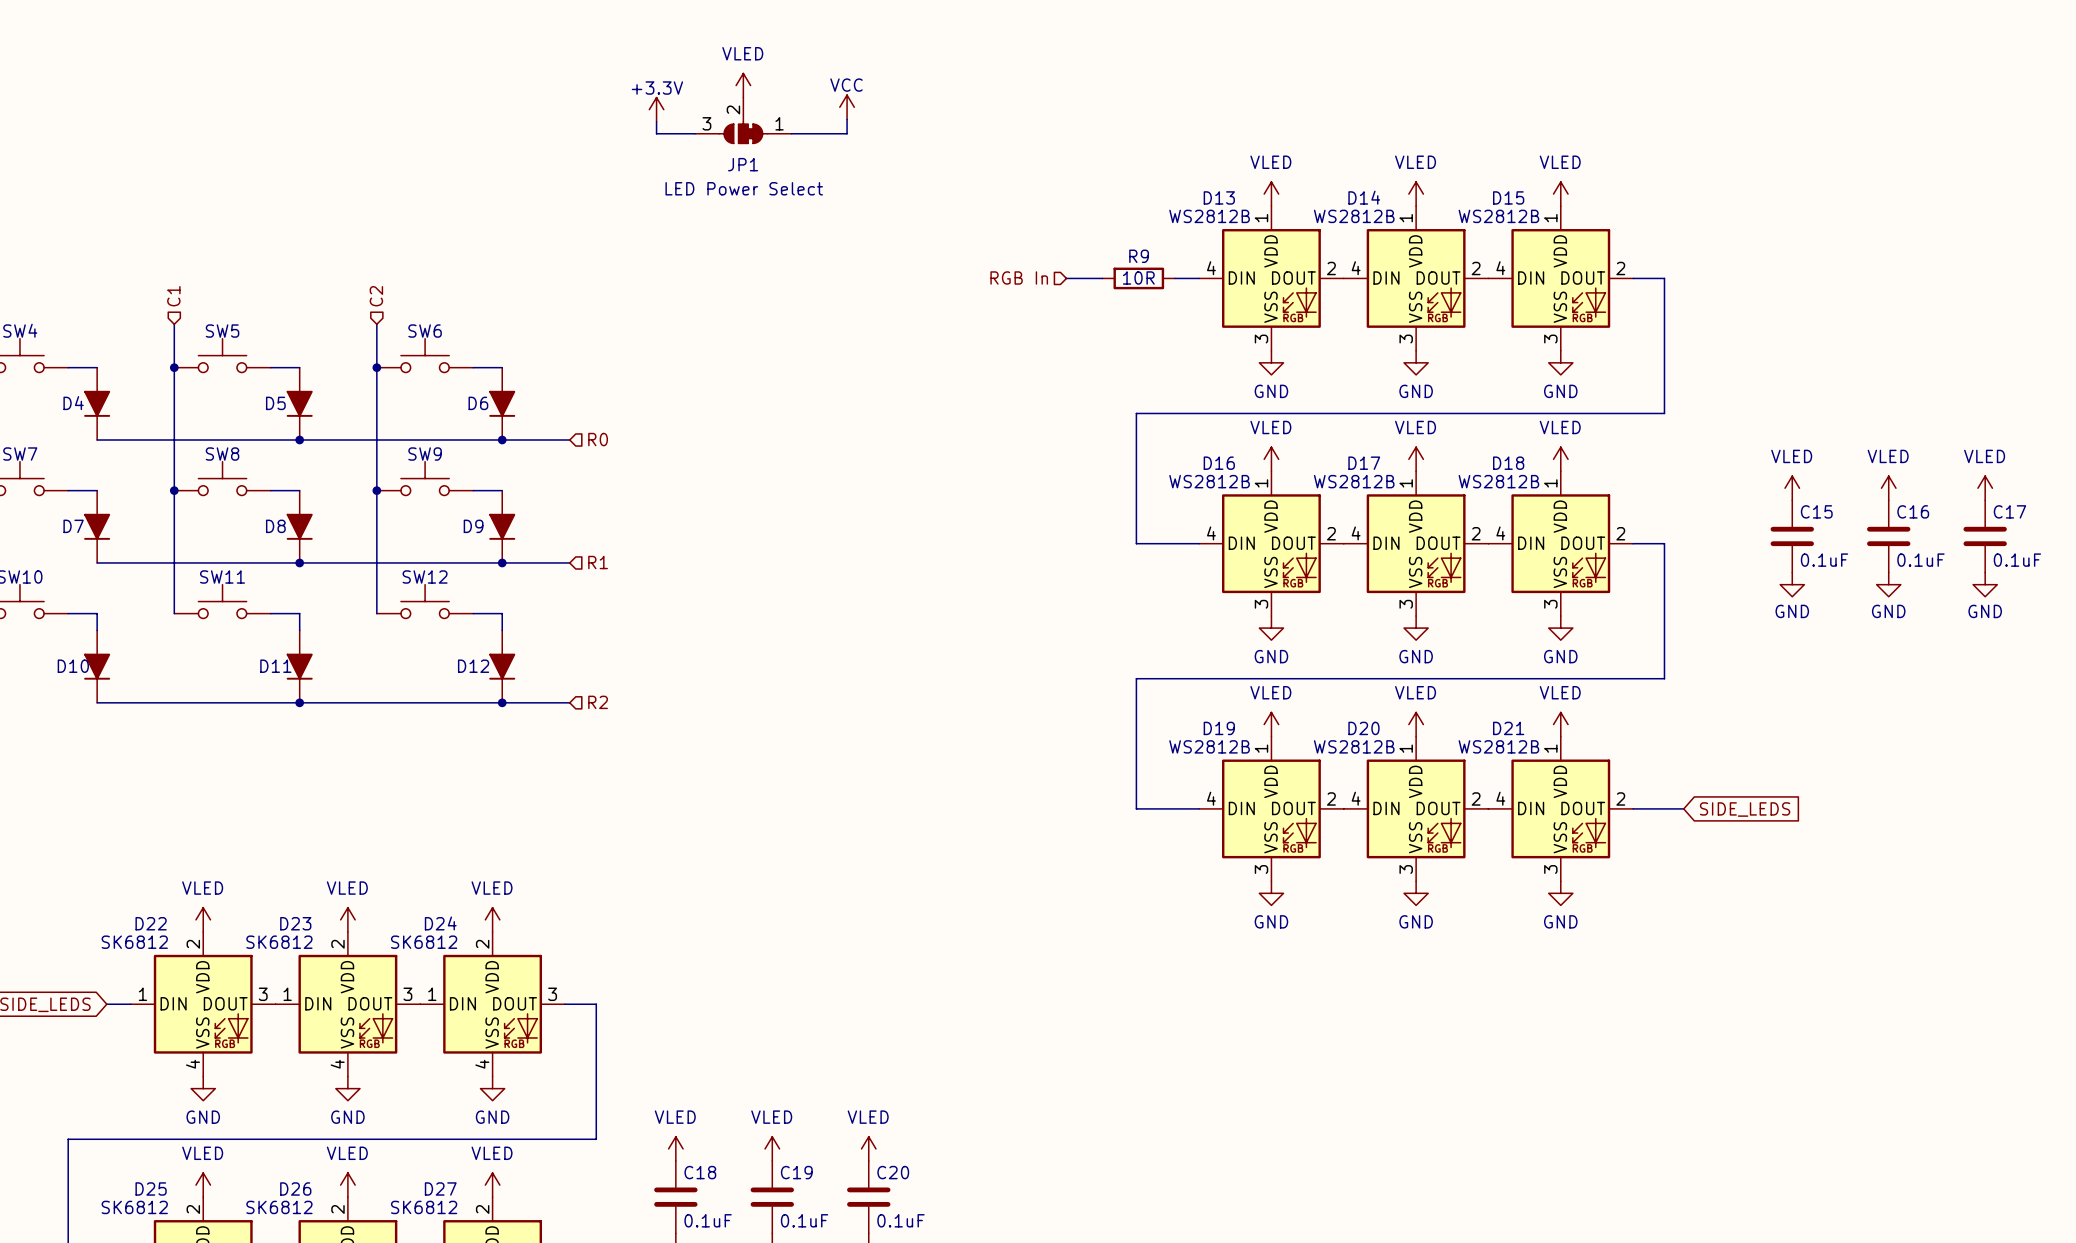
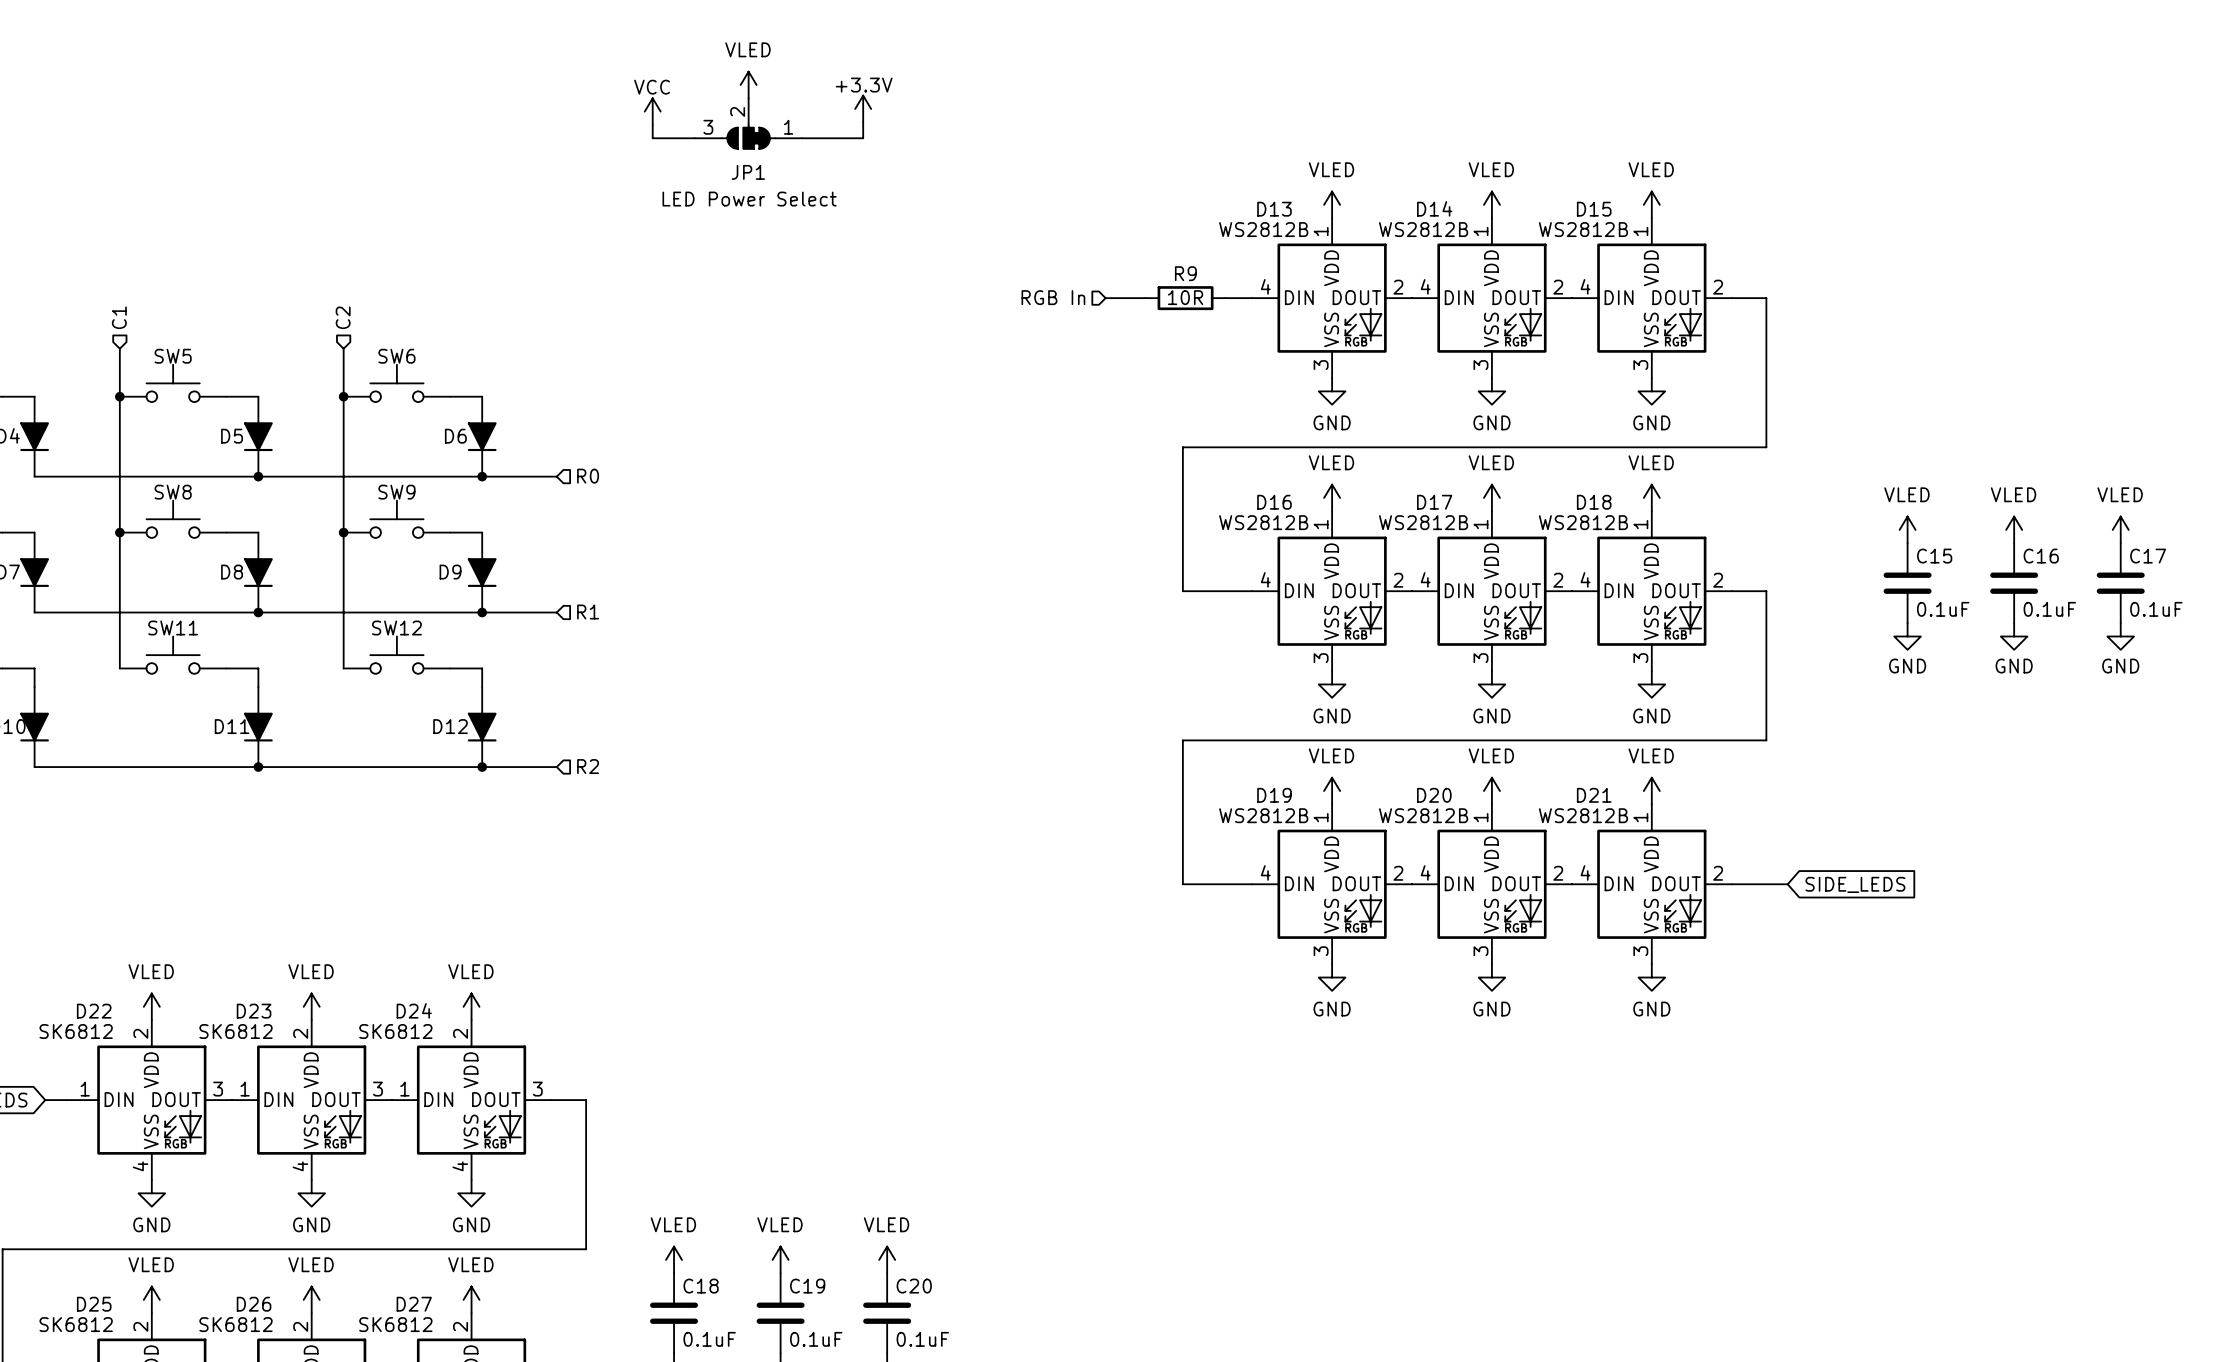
power symbol: VCC (847, 107) -> +3.3V (863, 108)
power symbol: +3.3V (656, 109) -> VCC (652, 111)

